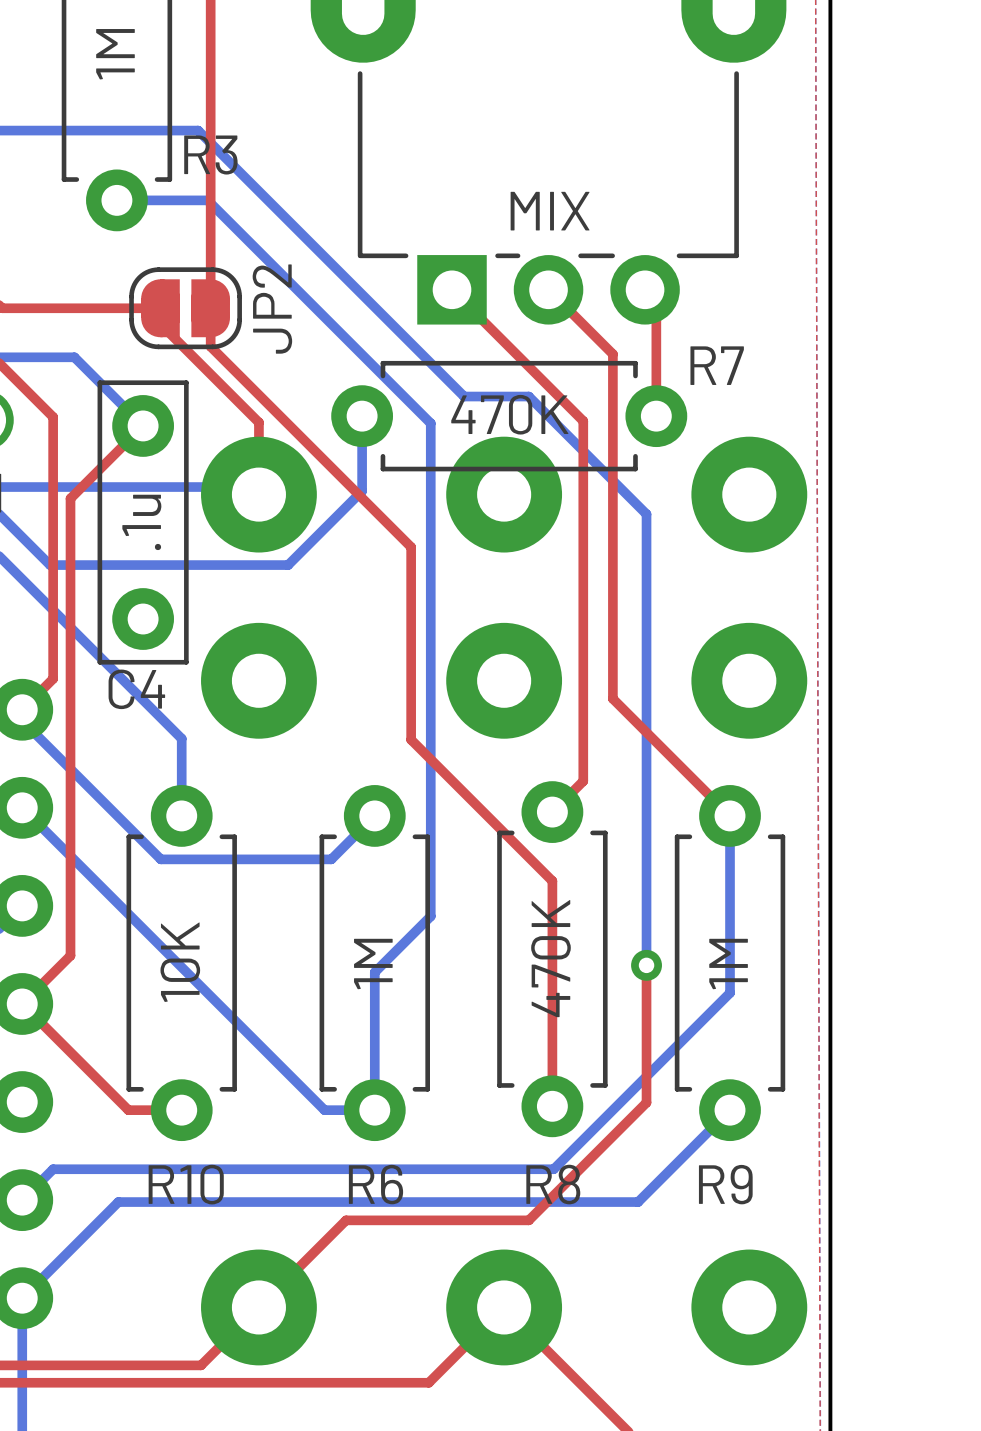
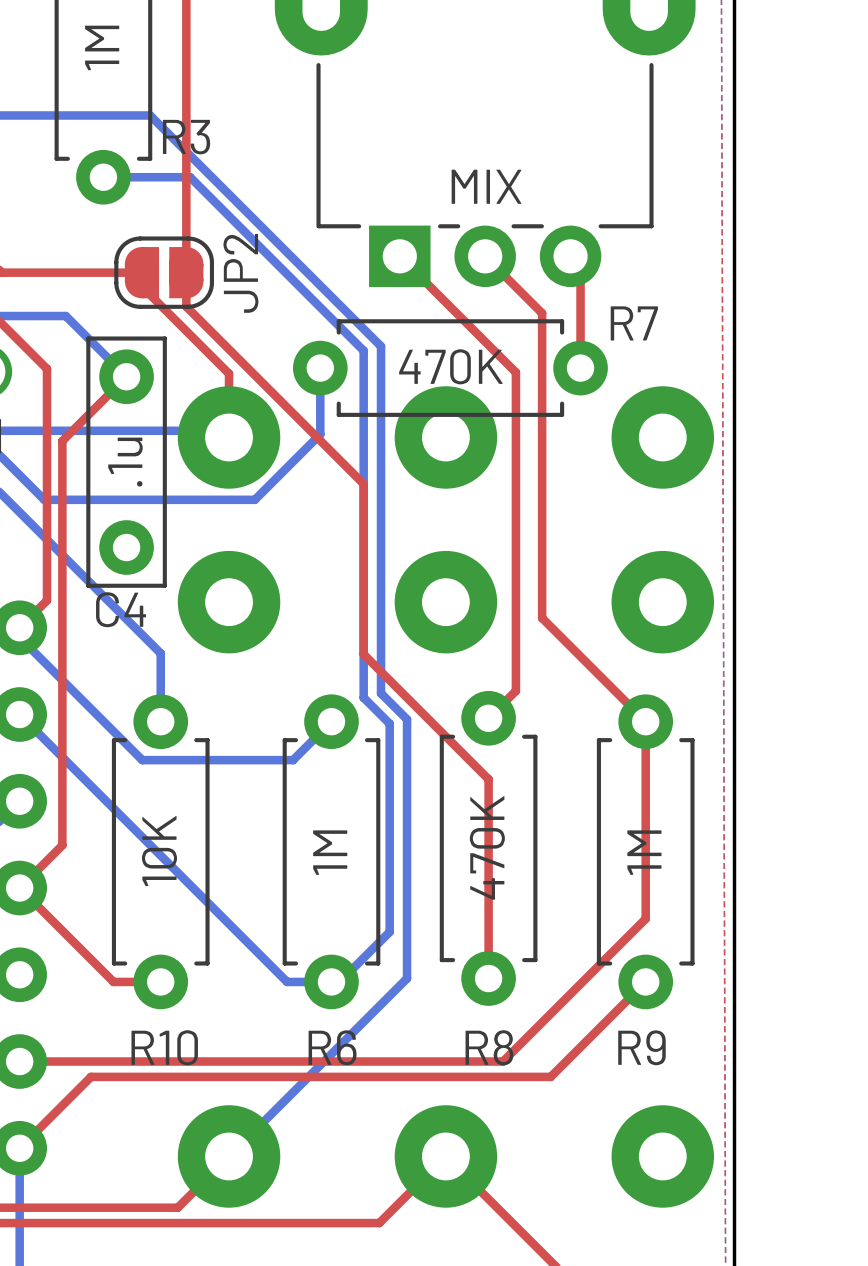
bottom track: (169, 130) (198, 130) (464, 396) (528, 396) (646, 514) (646, 965) -> none
bottom track: (207, 200) (430, 423) -> (150, 115) (381, 346) (381, 374)
bottom track: none -> (183, 177) (190, 177) (363, 350) (363, 697) (389, 723) (389, 931) (339, 981) (331, 981)
bottom track: (430, 783) (430, 916) (374, 972) (374, 1110) -> (381, 693) (407, 719) (407, 978) (229, 1156)
top track: none -> (645, 721) (645, 918) (503, 1061) (19, 1061)
bottom track: (730, 815) (730, 992) (553, 1169) (53, 1169) (22, 1200) -> none
top track: (646, 965) (646, 1102) (528, 1220) (346, 1220) (258, 1307) -> none
via: (646, 965) -> none
top track: none -> (645, 981) (550, 1076) (91, 1076) (19, 1148)
bottom track: (730, 1110) (638, 1202) (118, 1202) (22, 1298) -> none

